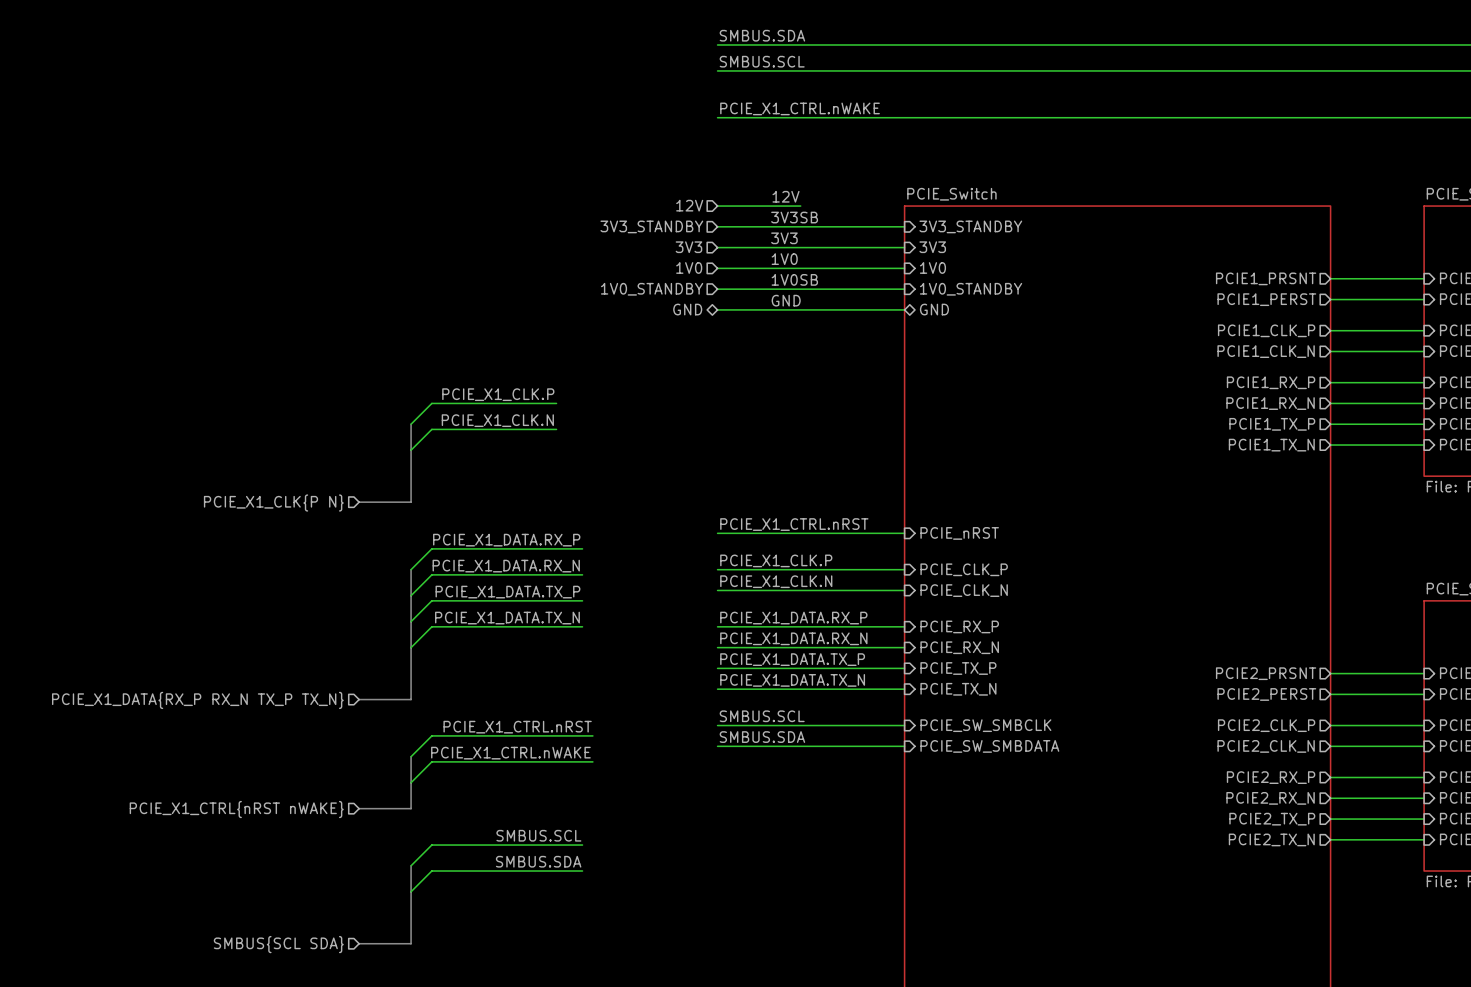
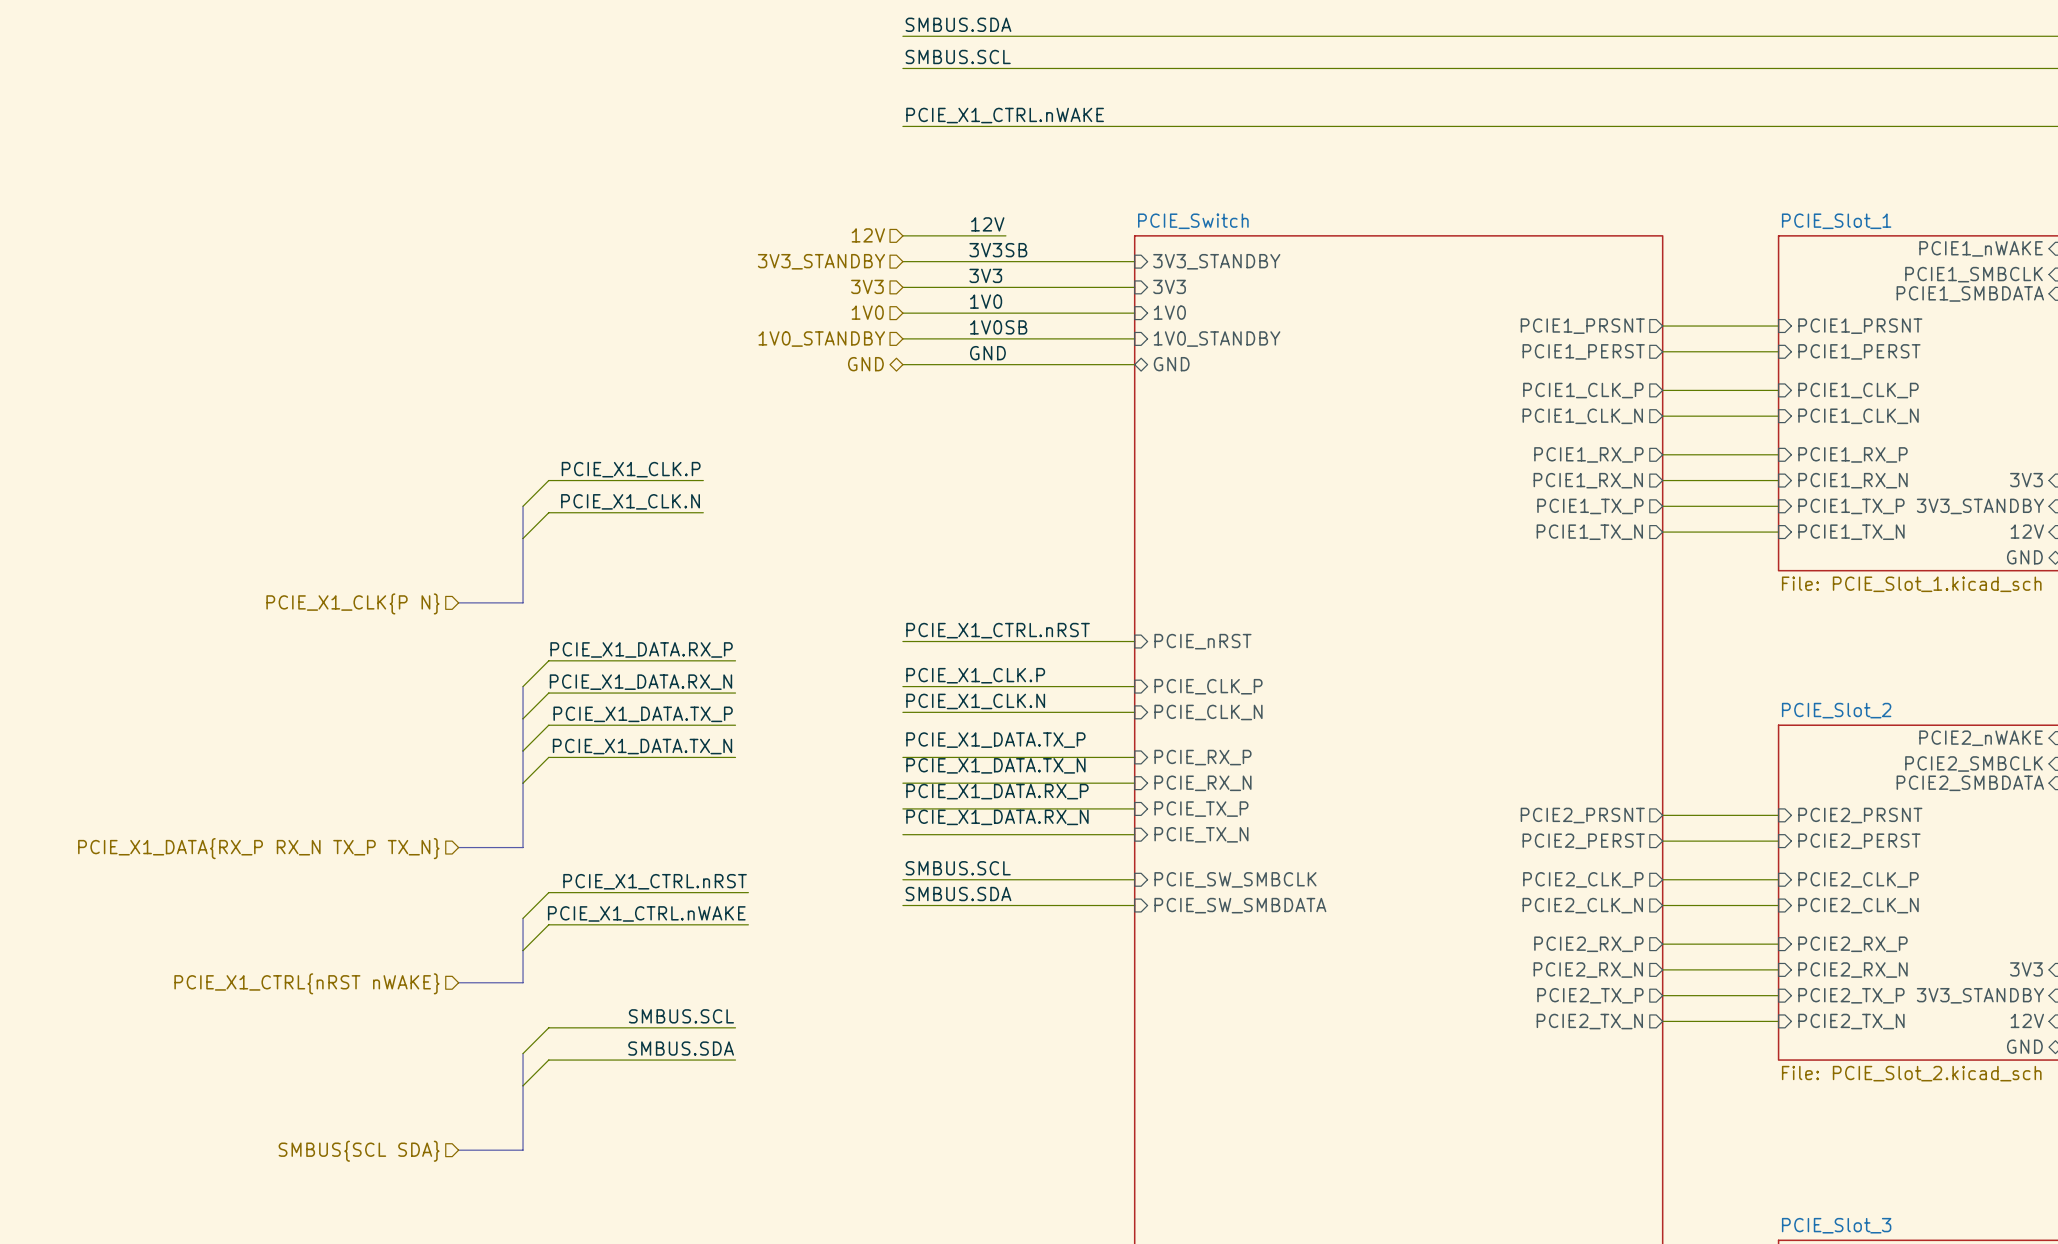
label: PCIE_X1_DATA.RX_P (793, 618) -> PCIE_X1_DATA.TX_P (995, 740)
label: PCIE_X1_DATA.RX_N (793, 638) -> PCIE_X1_DATA.TX_N (995, 765)
label: PCIE_X1_DATA.TX_P (792, 659) -> PCIE_X1_DATA.RX_P (997, 791)
label: PCIE_X1_DATA.TX_N (792, 680) -> PCIE_X1_DATA.RX_N (997, 817)

